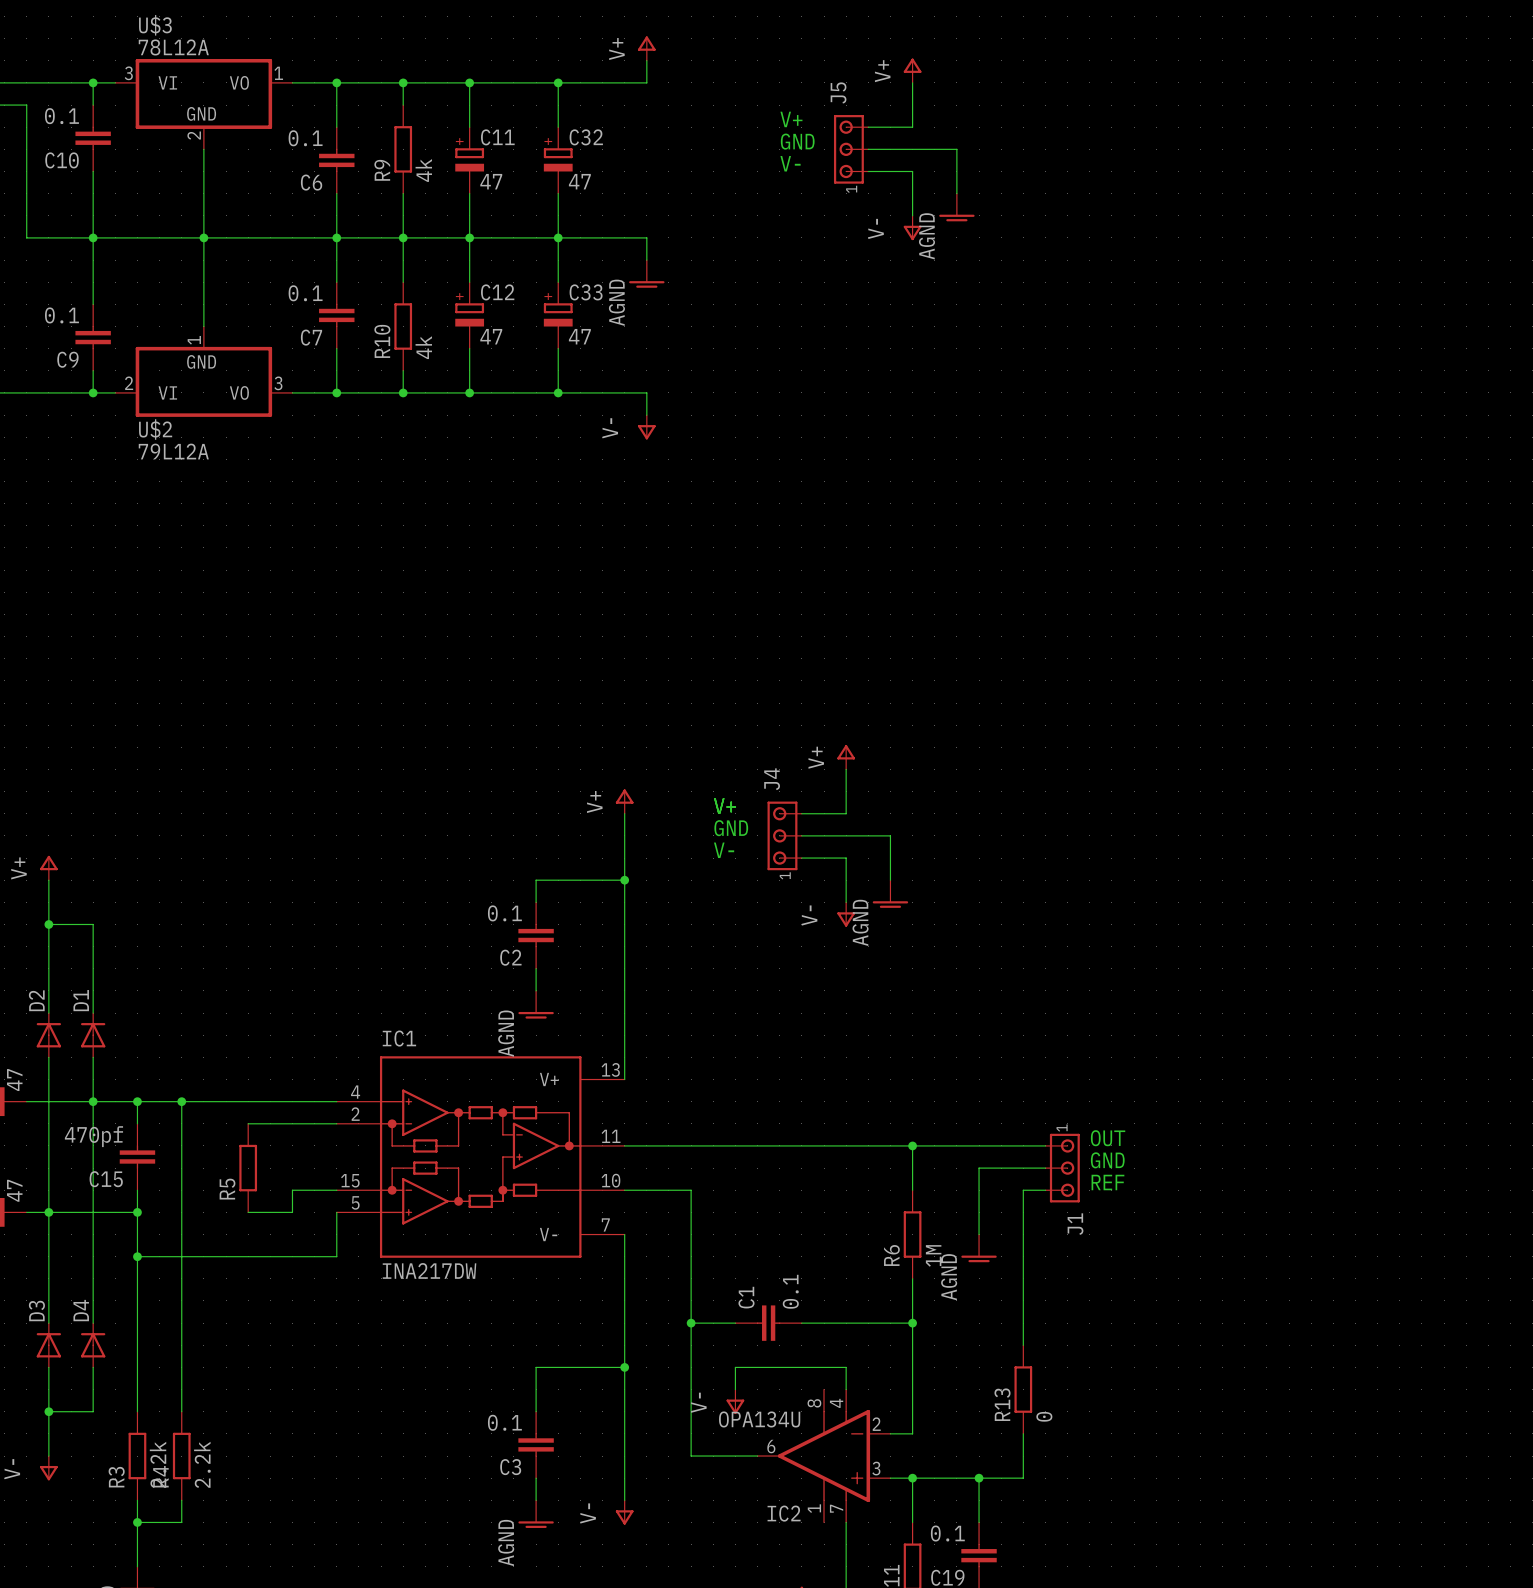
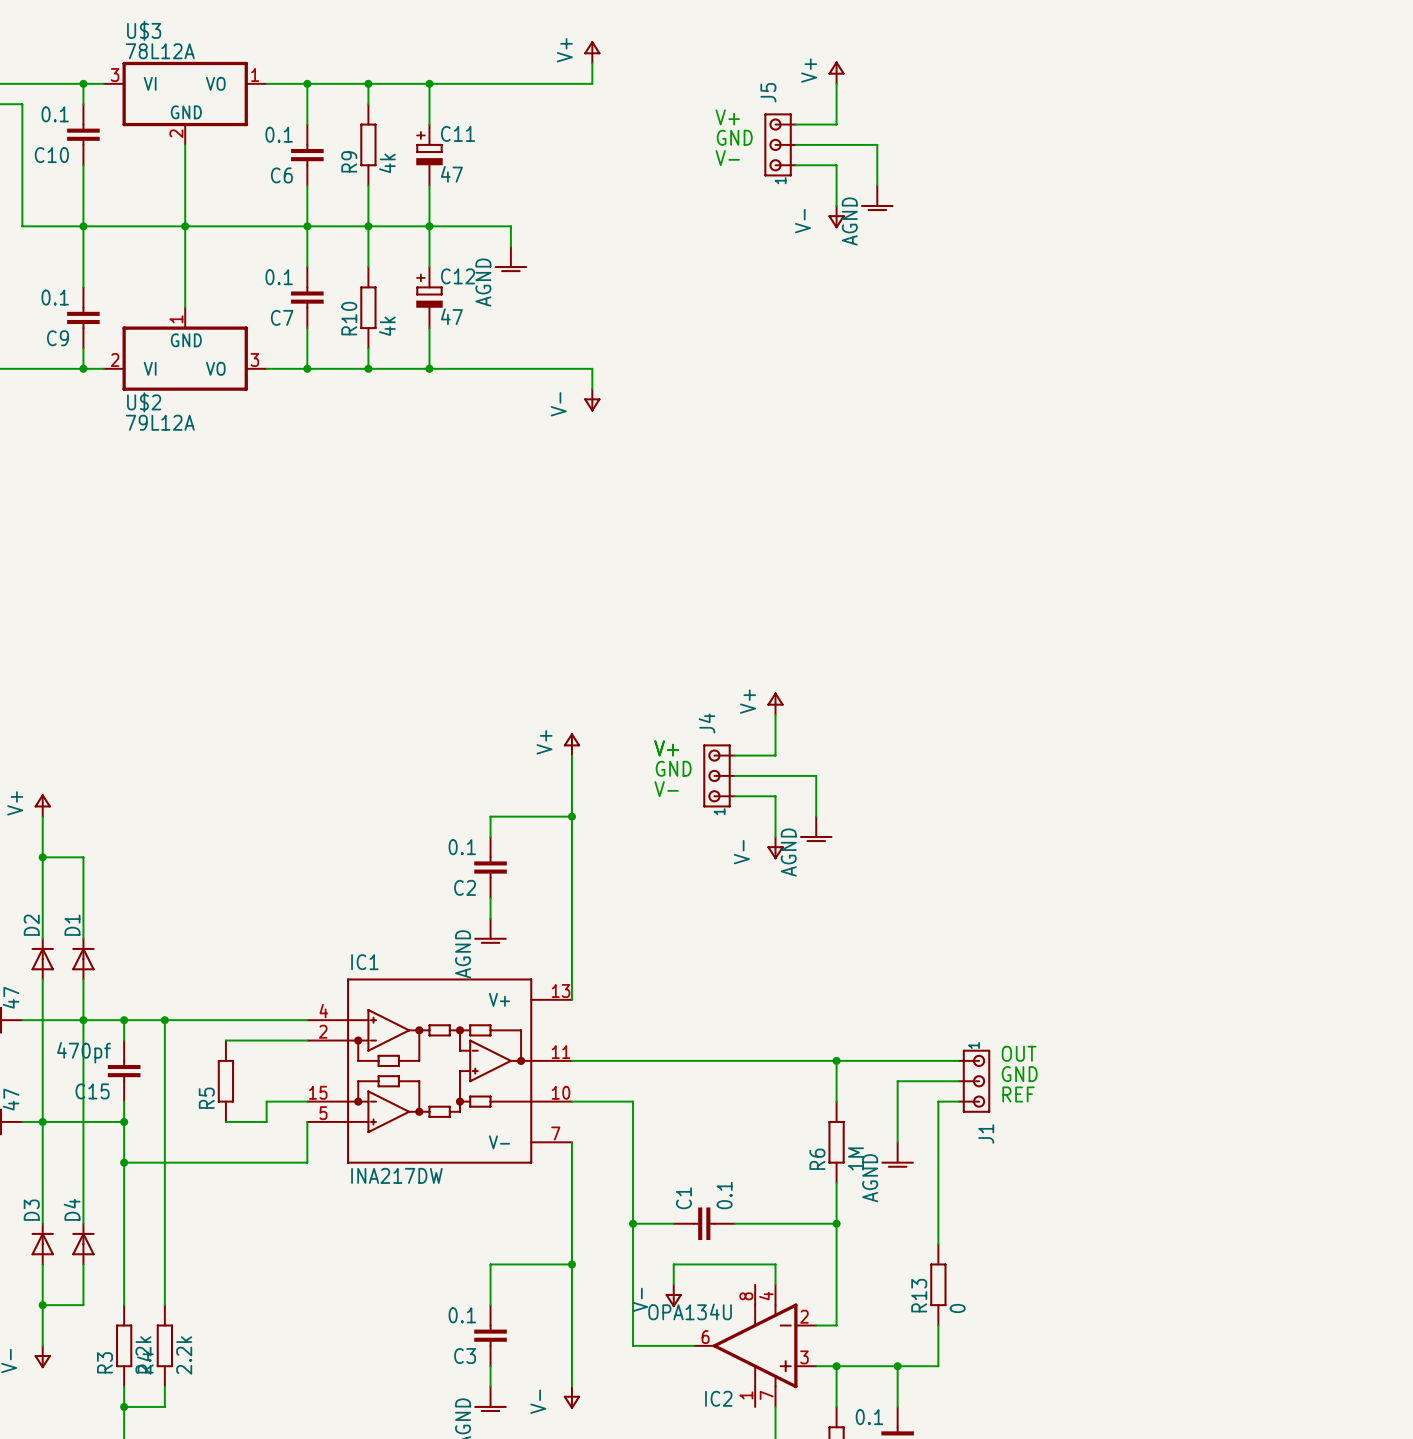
wire: (558, 82) (558, 127) -> none
junction: (558, 82) -> none
C32: 47 (558, 160) -> none
wire: (558, 193) (558, 237) (646, 237) (646, 260) -> none
junction: (558, 237) -> none
power symbol position: AGND (646, 273) -> AGND (510, 259)
C33: 47 (558, 315) -> none
wire: (558, 348) (558, 392) -> none
junction: (558, 392) -> none

